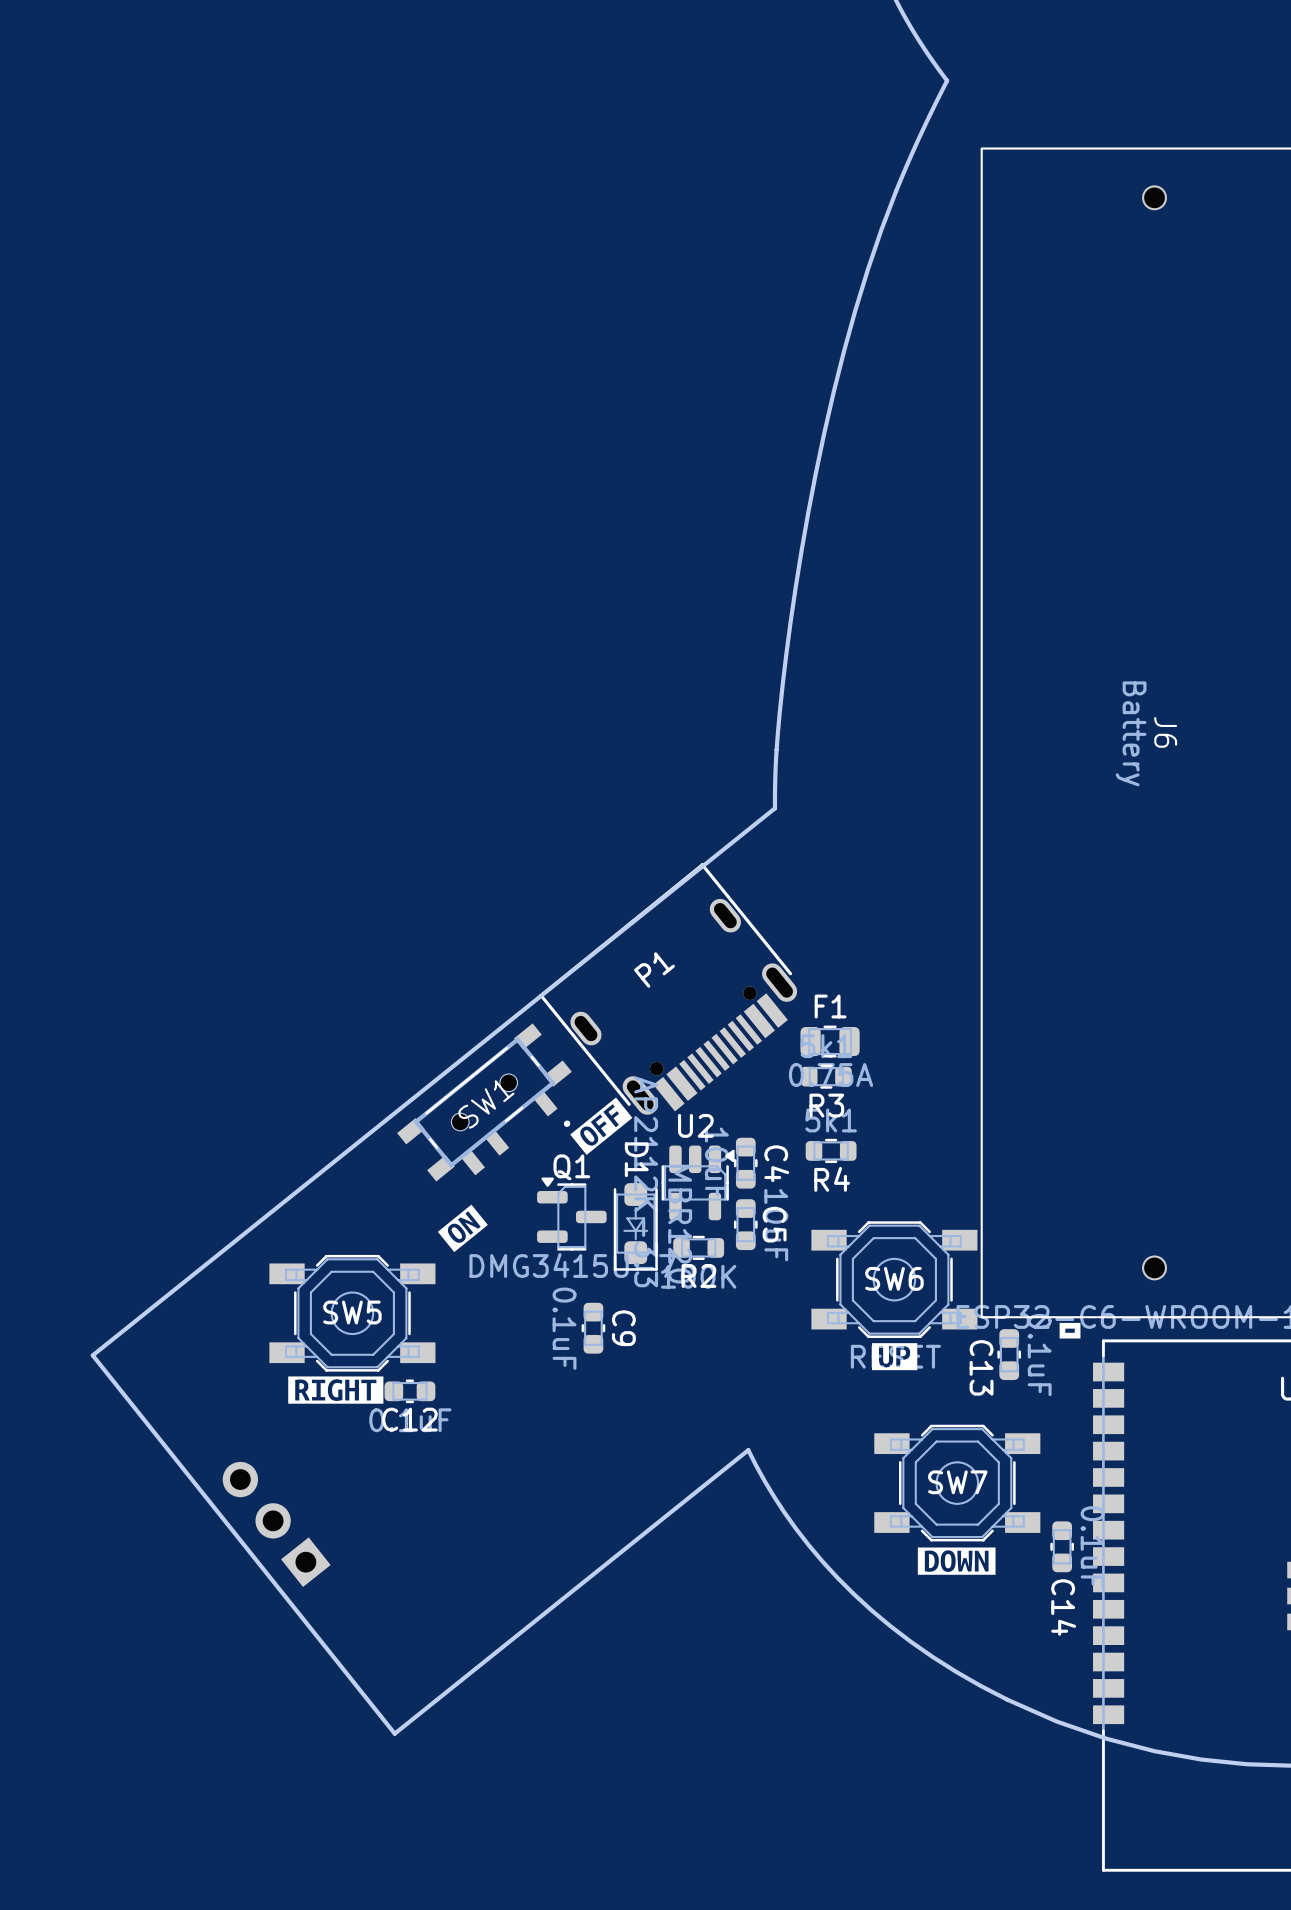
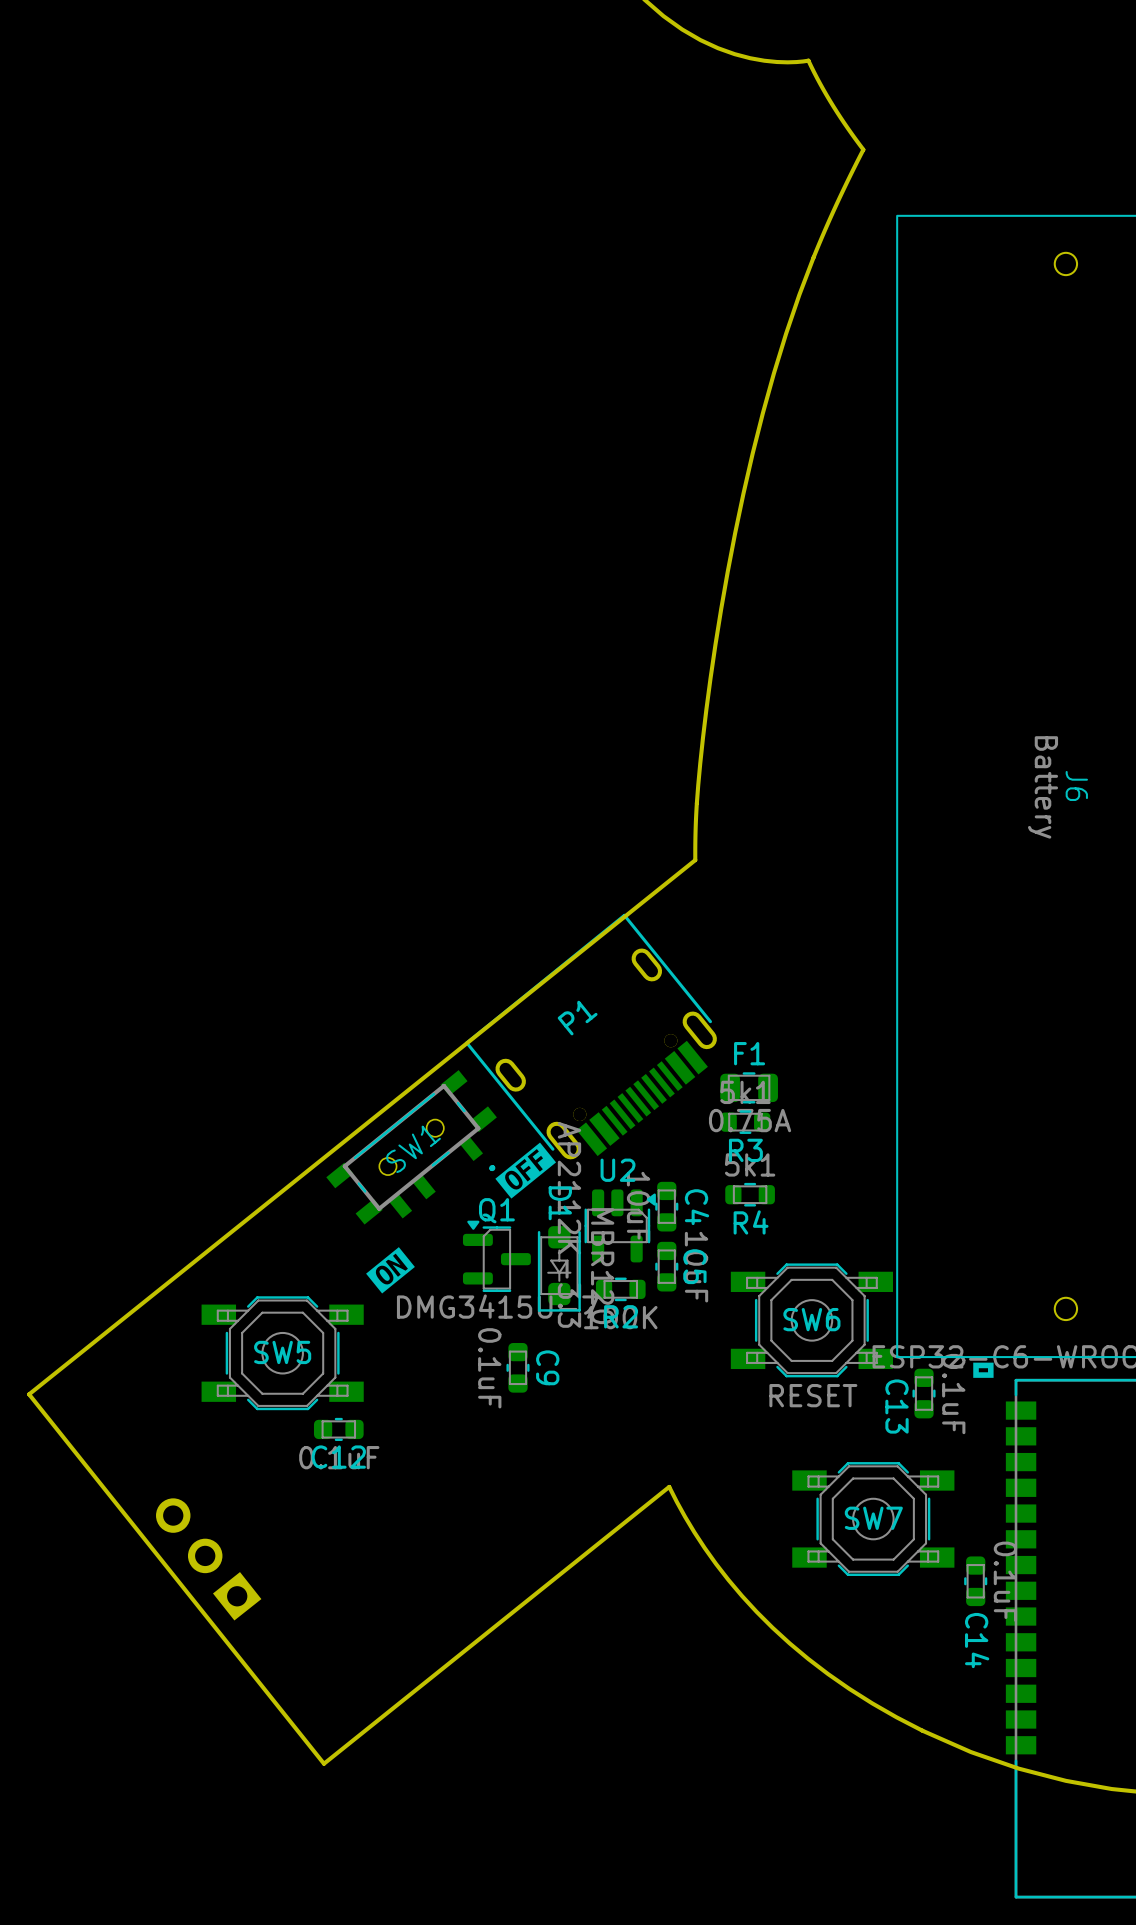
drawing: [872, 1343, 918, 1371] -> none
drawing: [288, 1376, 384, 1404] -> none
drawing: [917, 1547, 996, 1575] -> none

